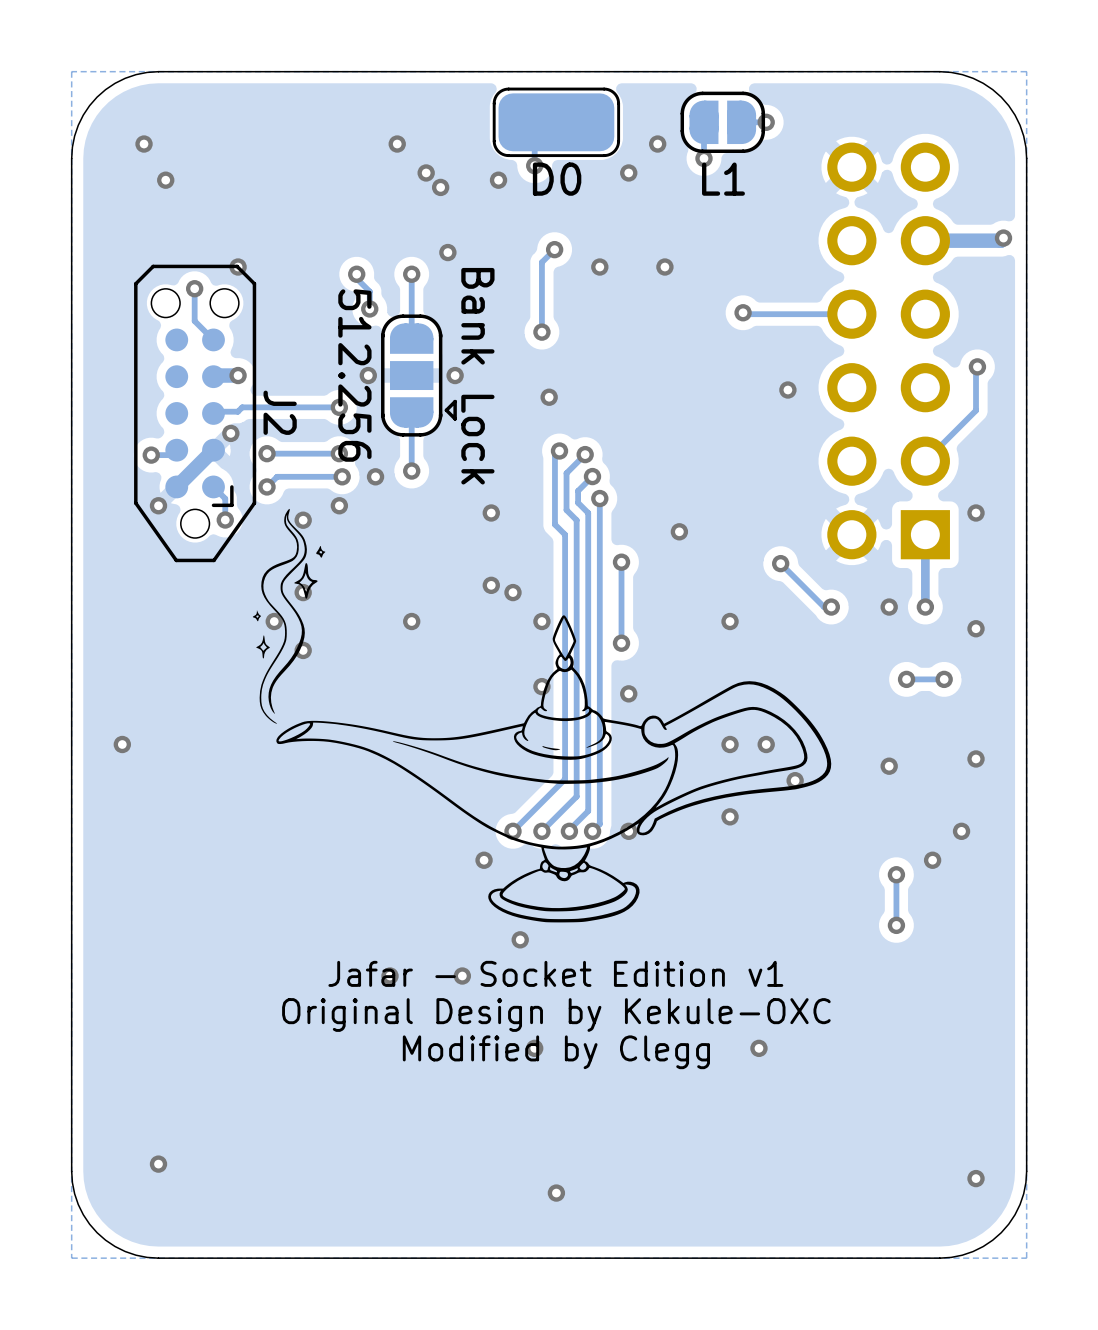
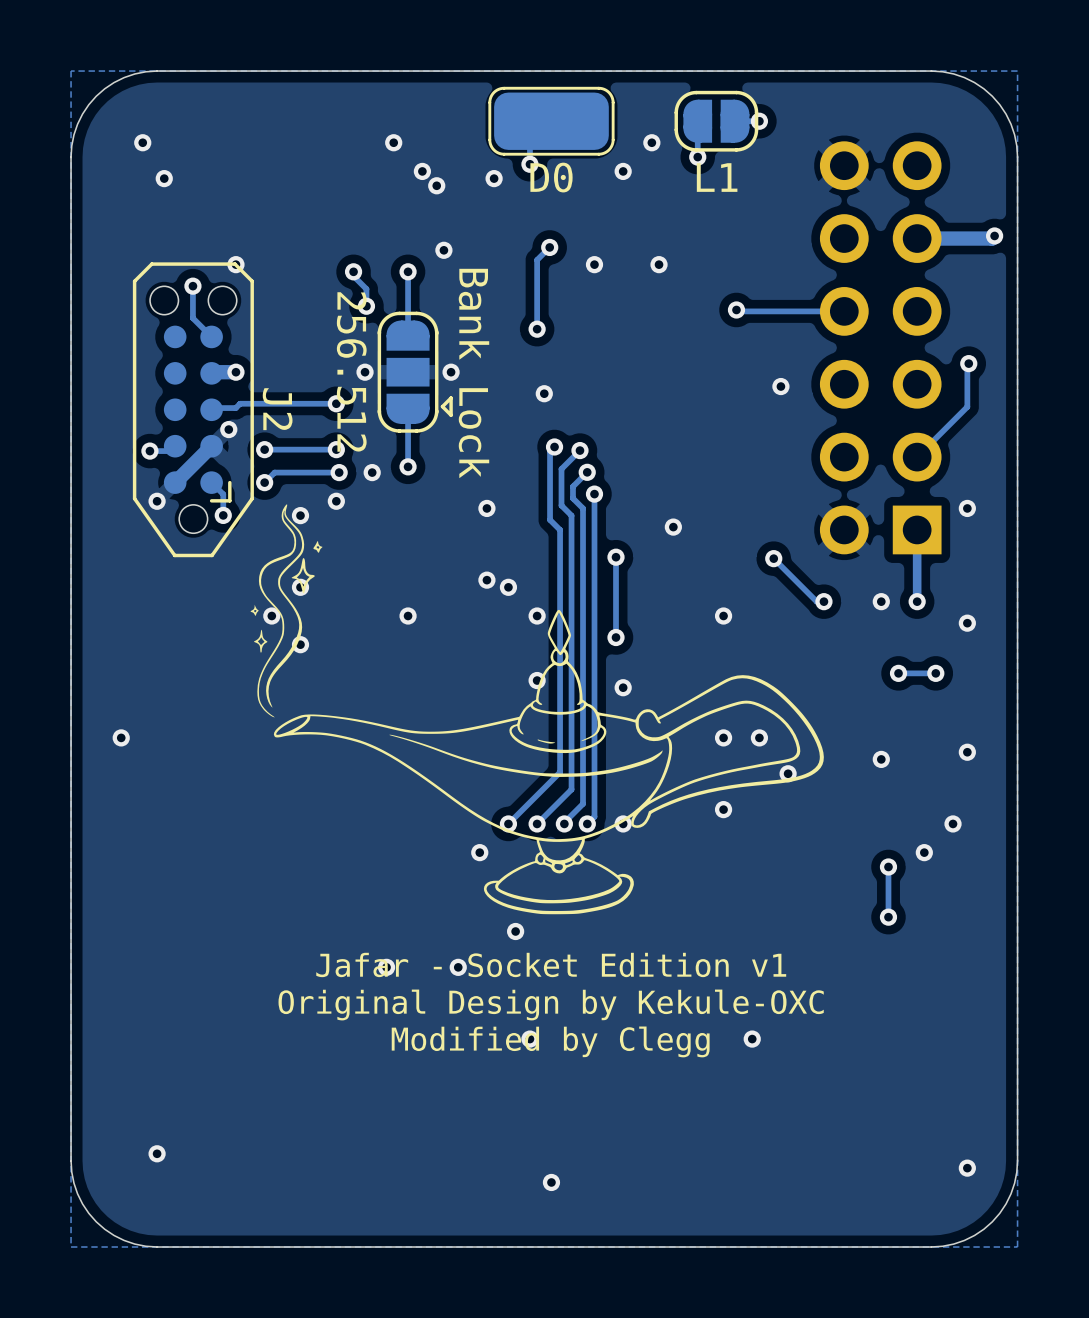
part text: 512.256 (354, 375) -> 256.512 (351, 371)

